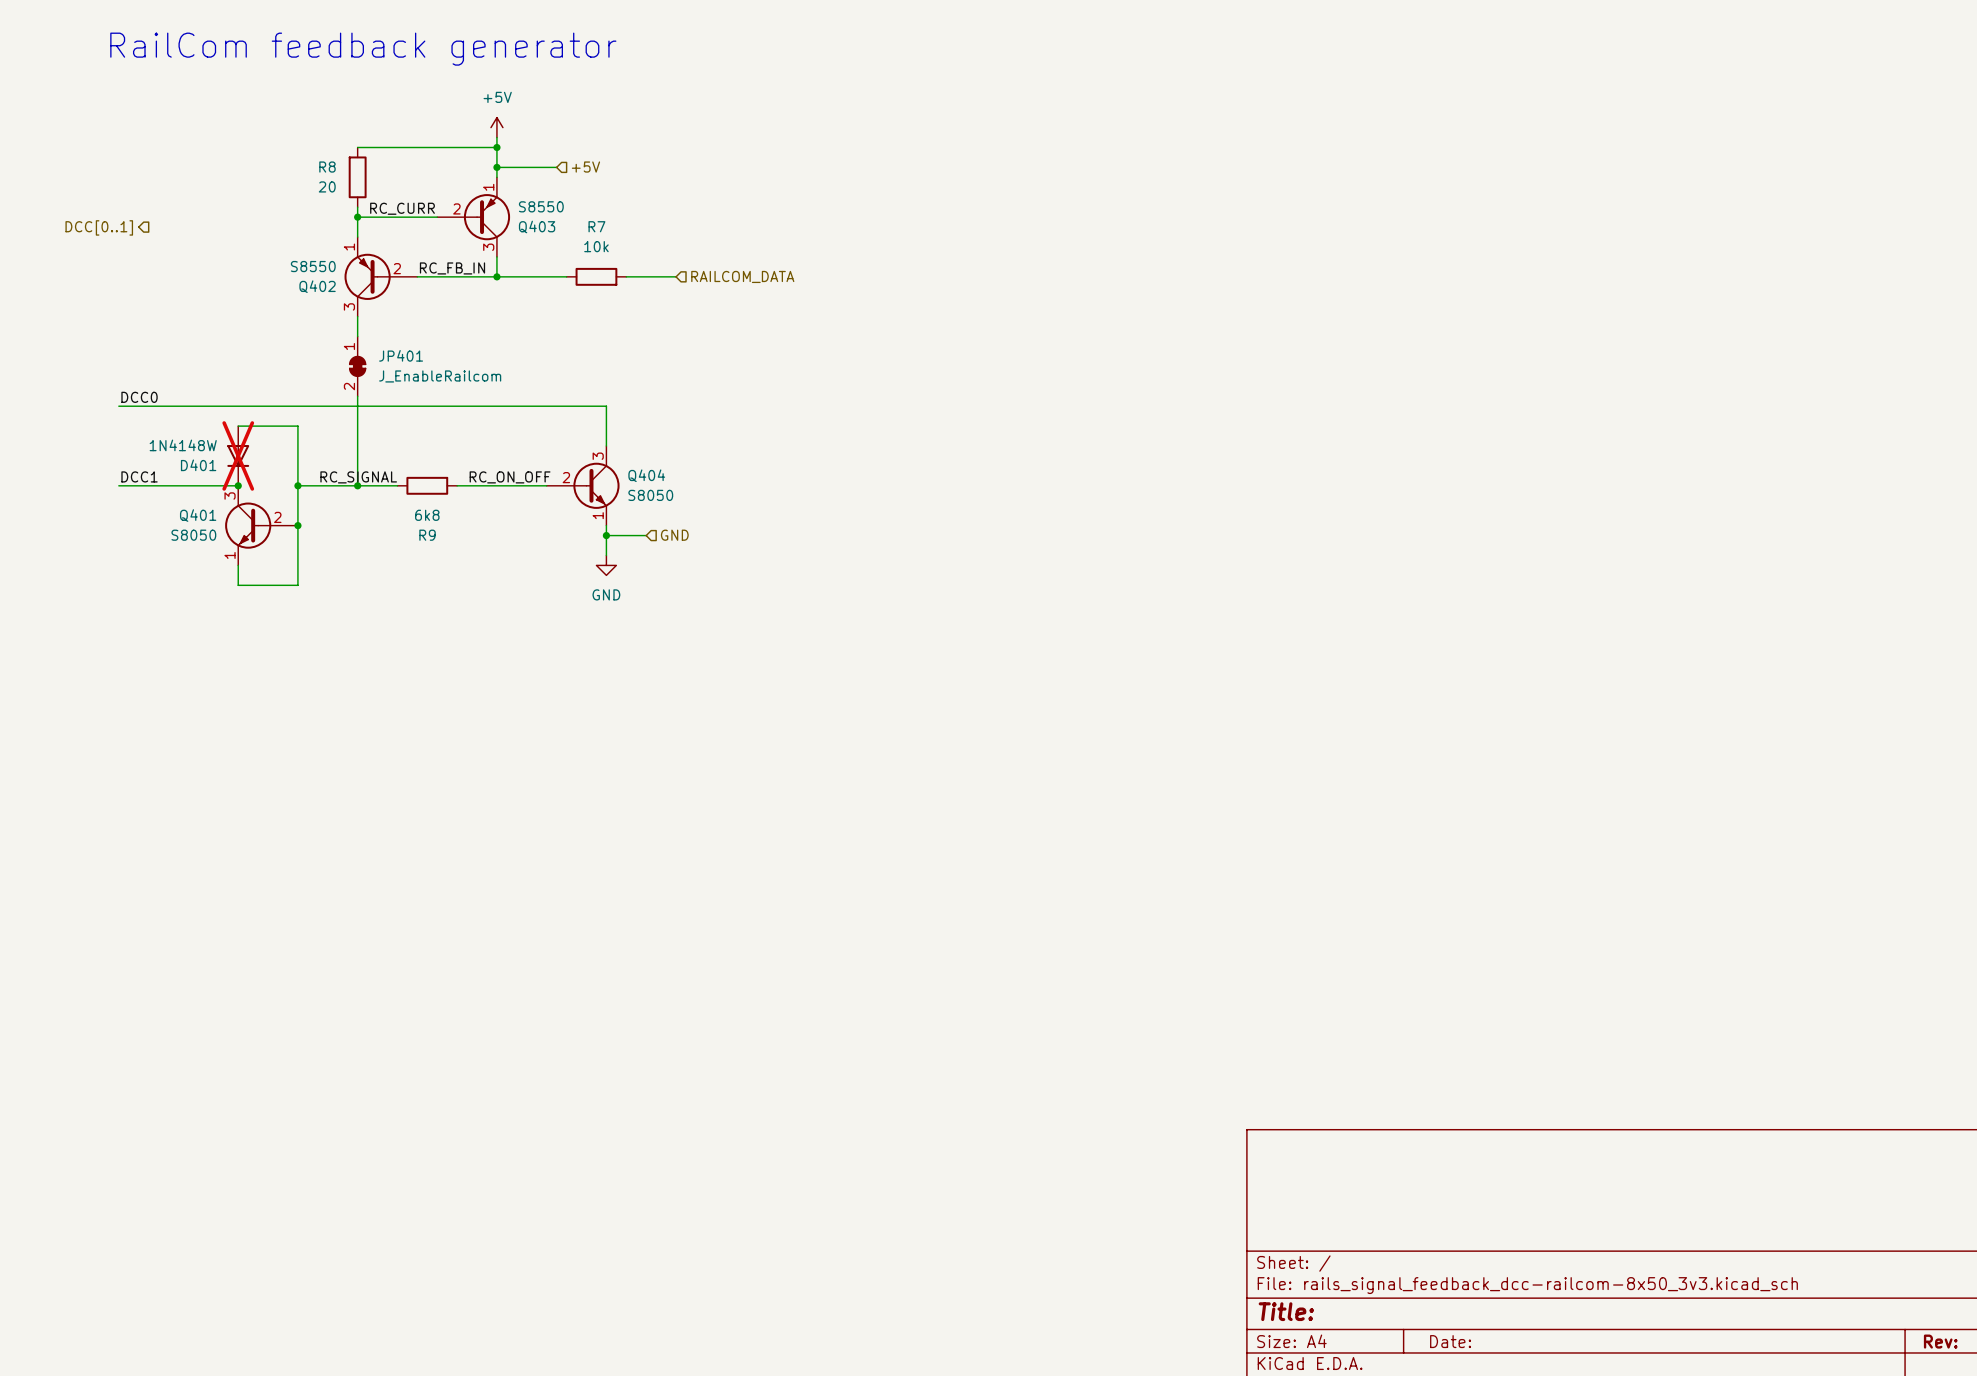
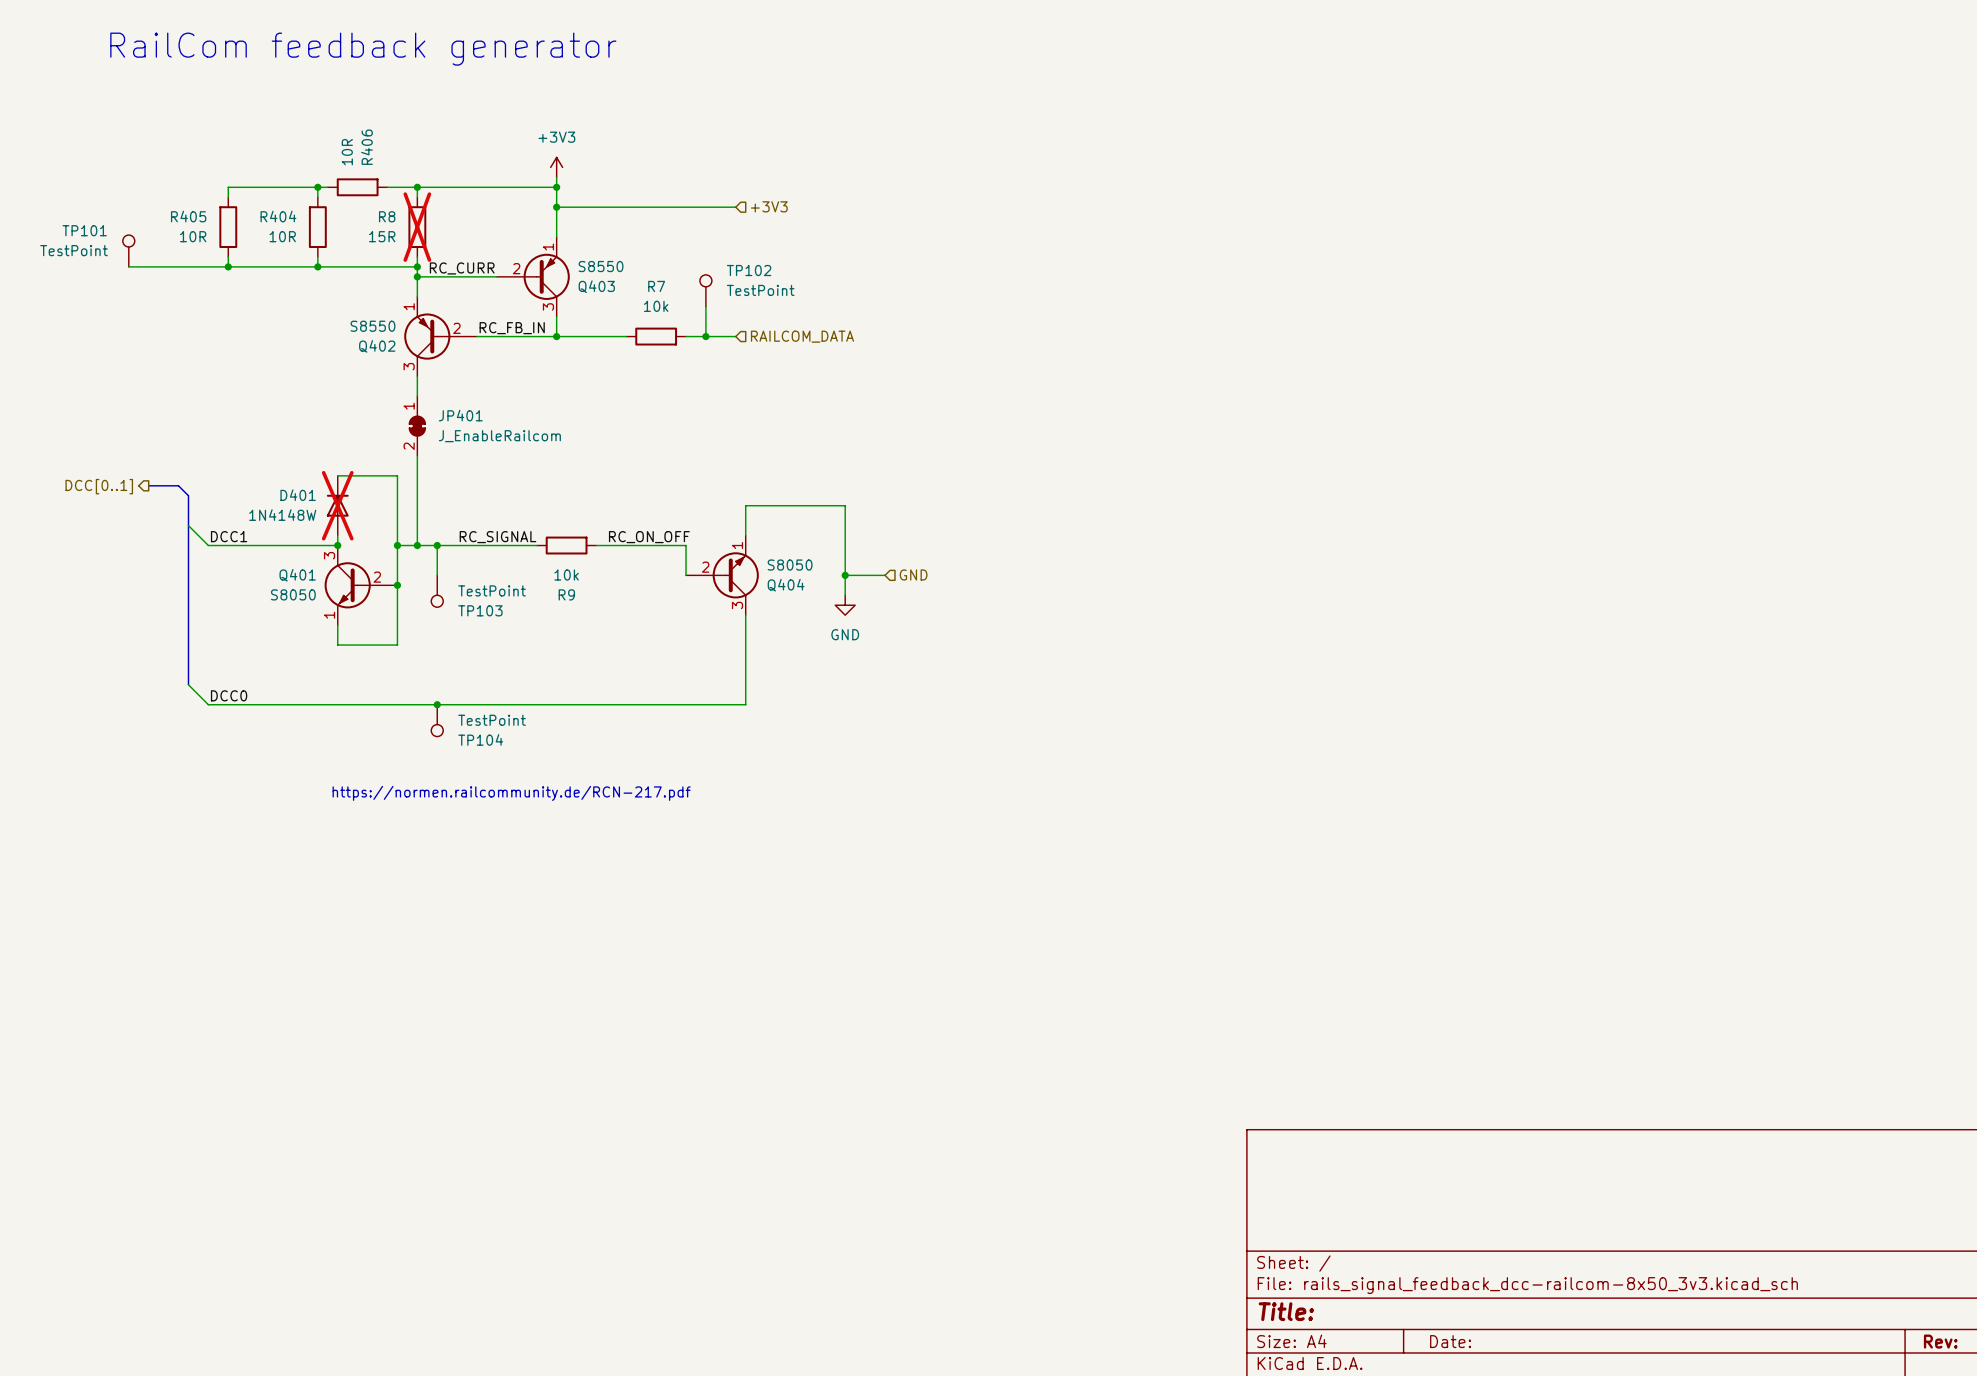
power symbol: +5V (496, 127) -> none
wire: (496, 137) (496, 177) -> (417, 256) (417, 296)
wire: (357, 147) (496, 147) -> none
junction: (496, 147) -> none
wire: (496, 167) (556, 167) -> none
junction: (496, 167) -> none
power symbol: none -> +3V3 (556, 167)
hierarchical label: +5V (585, 167) -> none
R8 position: (357, 177) -> (417, 227)
wire: none -> (556, 177) (556, 237)
R8 value: 20 (327, 186) -> 15R (382, 236)
wire: none -> (317, 187) (317, 197)
junction: none -> (317, 187)
wire: none -> (327, 187) (228, 187) (228, 197)
R406: none -> 10R (357, 187)
wire: none -> (387, 187) (556, 187)
wire: none -> (417, 187) (417, 197)
junction: none -> (417, 187)
junction: none -> (556, 187)
hierarchical label: none -> +3V3 (769, 206)
wire: (357, 207) (357, 237) -> none
wire: none -> (556, 207) (735, 207)
junction: none -> (556, 207)
label position: RC_CURR (402, 208) -> RC_CURR (462, 268)
wire: (357, 217) (437, 217) -> none
junction: (357, 217) -> none
Q403 position: (473, 217) -> (533, 276)
hierarchical label: DCC[0..1] (99, 227) -> none
R405: none -> 10R (228, 227)
R404: none -> 10R (317, 227)
R8 do-not-place cross: none -> (417, 227)
TP101: none -> TestPoint (128, 250)
wire: none -> (228, 256) (228, 266)
wire: none -> (317, 256) (317, 266)
wire: (496, 256) (496, 276) (566, 276) -> none
wire: none -> (128, 266) (417, 266)
junction: none -> (228, 266)
junction: none -> (317, 266)
junction: none -> (417, 266)
label position: RC_FB_IN (452, 268) -> RC_FB_IN (512, 328)
Q402 position: (380, 276) -> (440, 336)
junction: none -> (417, 276)
junction: (496, 276) -> none
R7 position: (596, 276) -> (656, 336)
wire: (626, 276) (676, 276) -> (686, 336) (735, 336)
hierarchical label position: RAILCOM_DATA (742, 276) -> RAILCOM_DATA (802, 336)
TP102: none -> TestPoint (705, 290)
wire: none -> (705, 306) (705, 336)
wire: (357, 316) (357, 336) -> (417, 376) (417, 396)
wire: none -> (556, 316) (556, 336)
wire: none -> (477, 336) (626, 336)
junction: none -> (556, 336)
junction: none -> (705, 336)
JP401 position: (357, 366) -> (417, 426)
wire: (357, 396) (357, 485) -> (417, 455) (417, 545)
label: DCC0 (139, 397) -> none
wire: (118, 406) (606, 406) (606, 446) -> none
wire: (238, 426) (297, 426) (297, 585) (238, 585) (238, 565) -> none
D401 value position: 1N4148W (183, 445) -> 1N4148W (282, 515)
D401 rotation: 0° (238, 455) -> 180° (337, 505)
D401 position: (238, 455) -> (337, 505)
D401 name position: D401 (198, 465) -> D401 (298, 495)
wire: none -> (337, 475) (397, 475) (397, 645) (337, 645) (337, 625)
label position: DCC1 (139, 476) -> DCC1 (229, 536)
label position: RC_SIGNAL (358, 477) -> RC_SIGNAL (497, 537)
label position: RC_ON_OFF (510, 477) -> RC_ON_OFF (649, 537)
wire: (118, 485) (238, 485) -> none
bus: none -> (148, 485) (178, 485) (188, 495) (188, 684)
junction: (238, 485) -> none
wire: (297, 485) (397, 485) -> none
junction: (297, 485) -> none
junction: (357, 485) -> none
R9 position: (427, 485) -> (566, 545)
wire: (457, 485) (546, 485) -> none
Q404 position: (583, 485) -> (722, 575)
Q404 flip: as is (596, 485) -> up-down (735, 575)
hierarchical label: none -> DCC[0..1] (99, 486)
R9 value: 6k8 (427, 515) -> 10k (566, 575)
wire: none -> (188, 525) (208, 545) (337, 545) (337, 535)
Q401 position: (261, 525) -> (361, 585)
junction: (297, 525) -> none
wire: (606, 525) (606, 555) -> (437, 545) (437, 575)
wire: (606, 535) (646, 535) -> none
junction: (606, 535) -> none
hierarchical label: GND (674, 535) -> none
wire: none -> (745, 535) (745, 505) (845, 505) (845, 595)
junction: none -> (337, 545)
wire: none -> (397, 545) (536, 545)
junction: none -> (397, 545)
junction: none -> (417, 545)
junction: none -> (437, 545)
wire: none -> (596, 545) (686, 545) (686, 575)
power symbol: GND (606, 565) -> none
wire: none -> (845, 575) (885, 575)
junction: none -> (845, 575)
hierarchical label: none -> GND (913, 575)
junction: none -> (397, 585)
TP103: none -> TestPoint (437, 591)
power symbol: none -> GND (845, 605)
wire: none -> (745, 615) (745, 704) (208, 704) (188, 684)
label: none -> DCC0 (229, 695)
junction: none -> (437, 704)
TP104: none -> TestPoint (437, 720)
text: none -> https://normen.railcommunity.de/RCN-217.pdf (511, 793)

